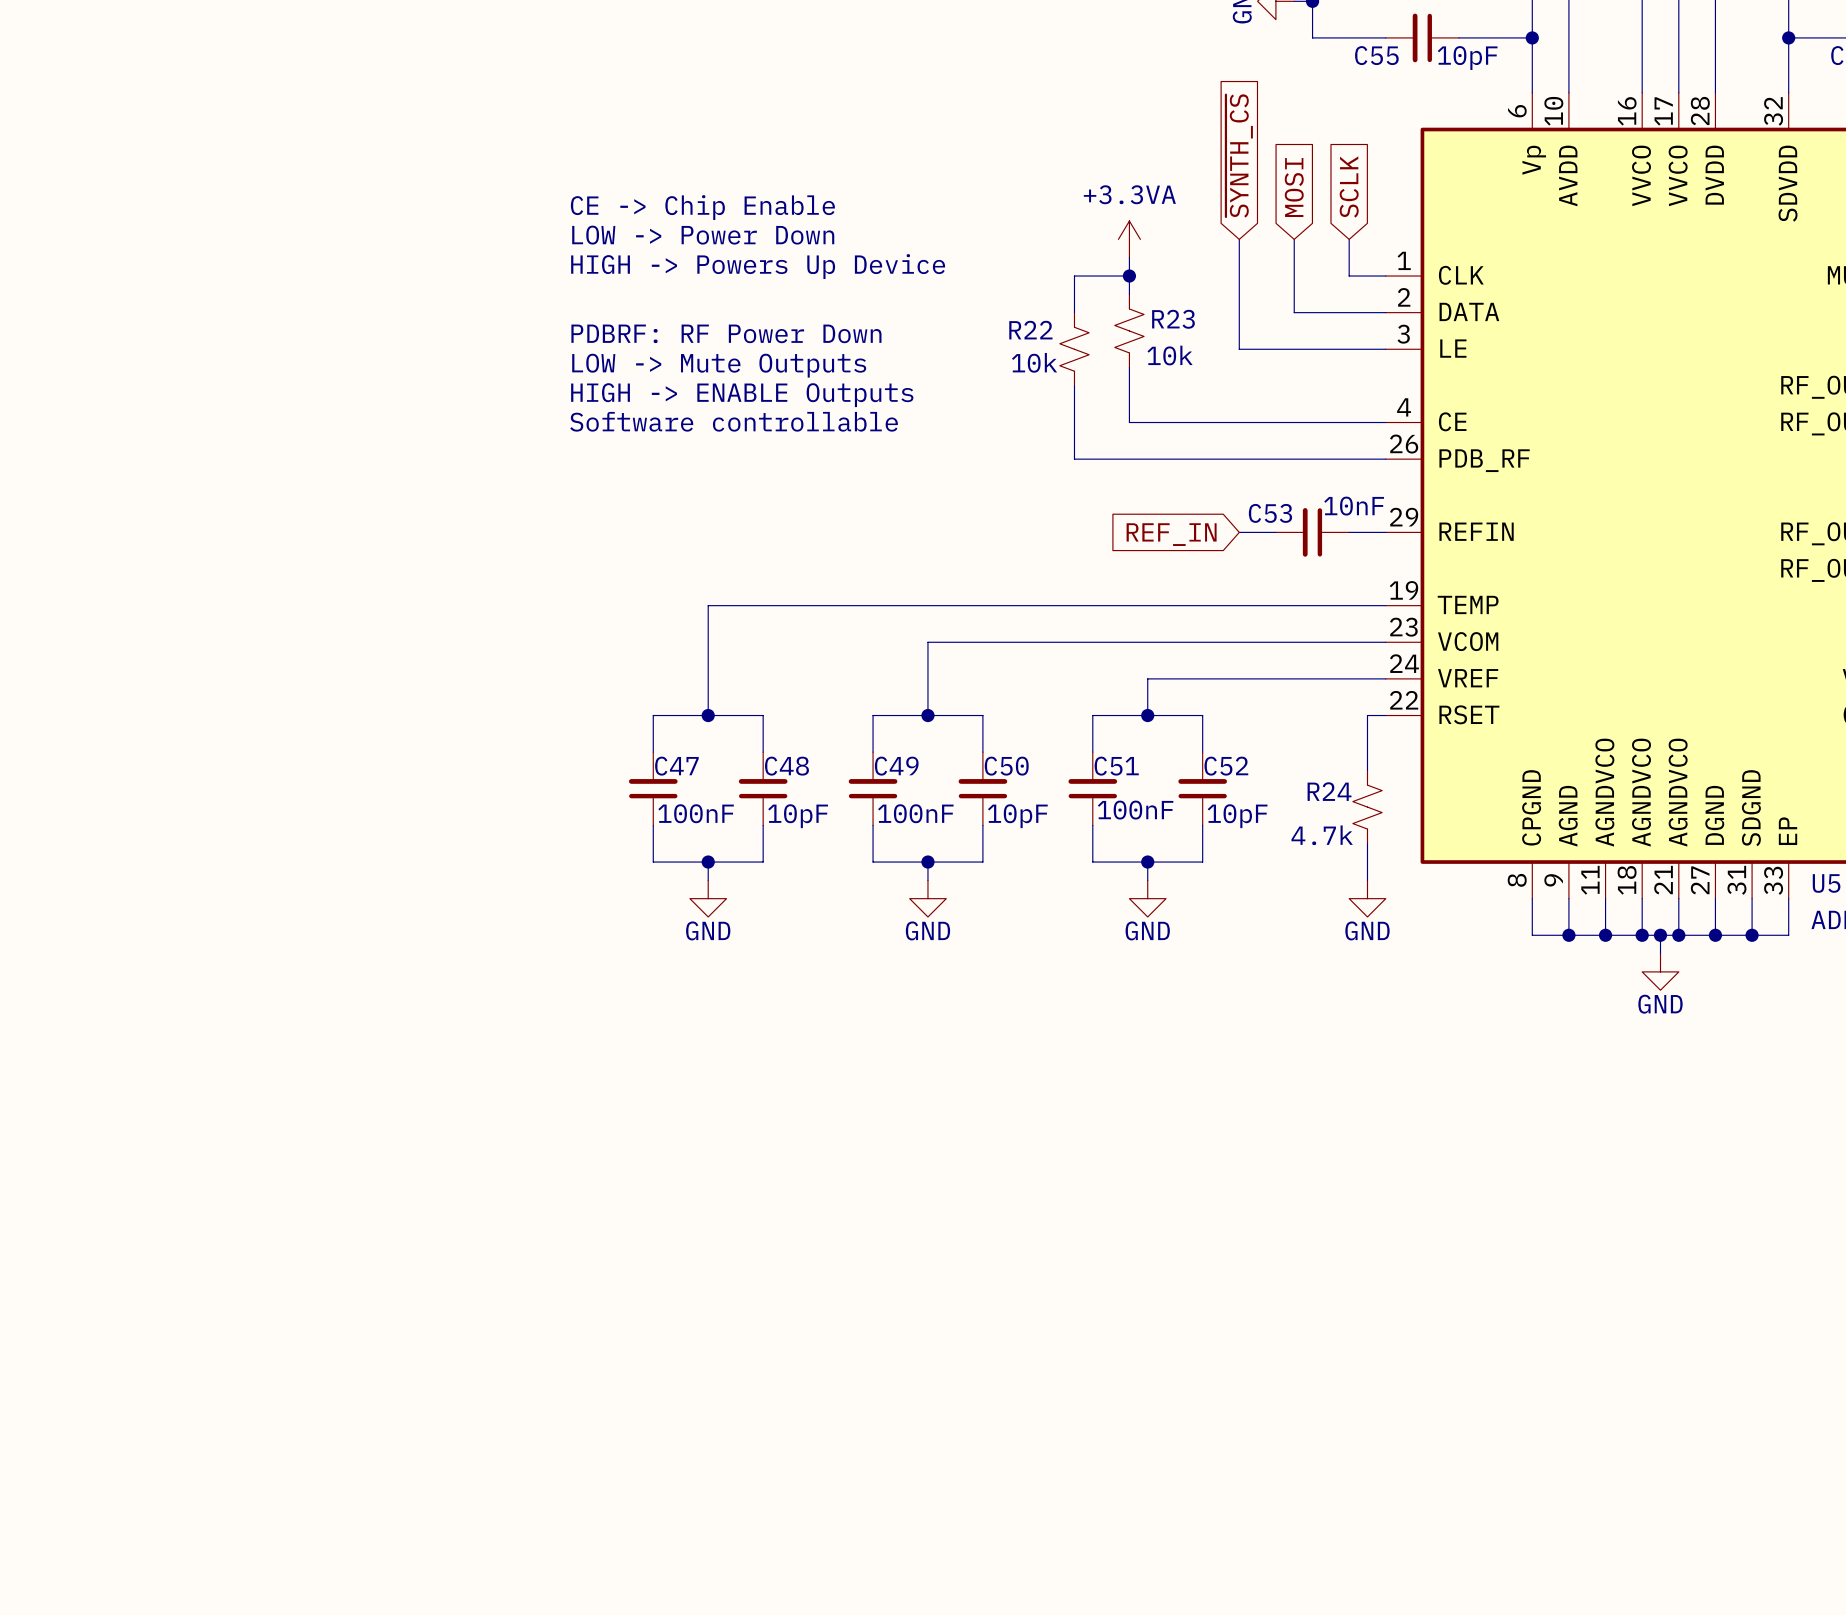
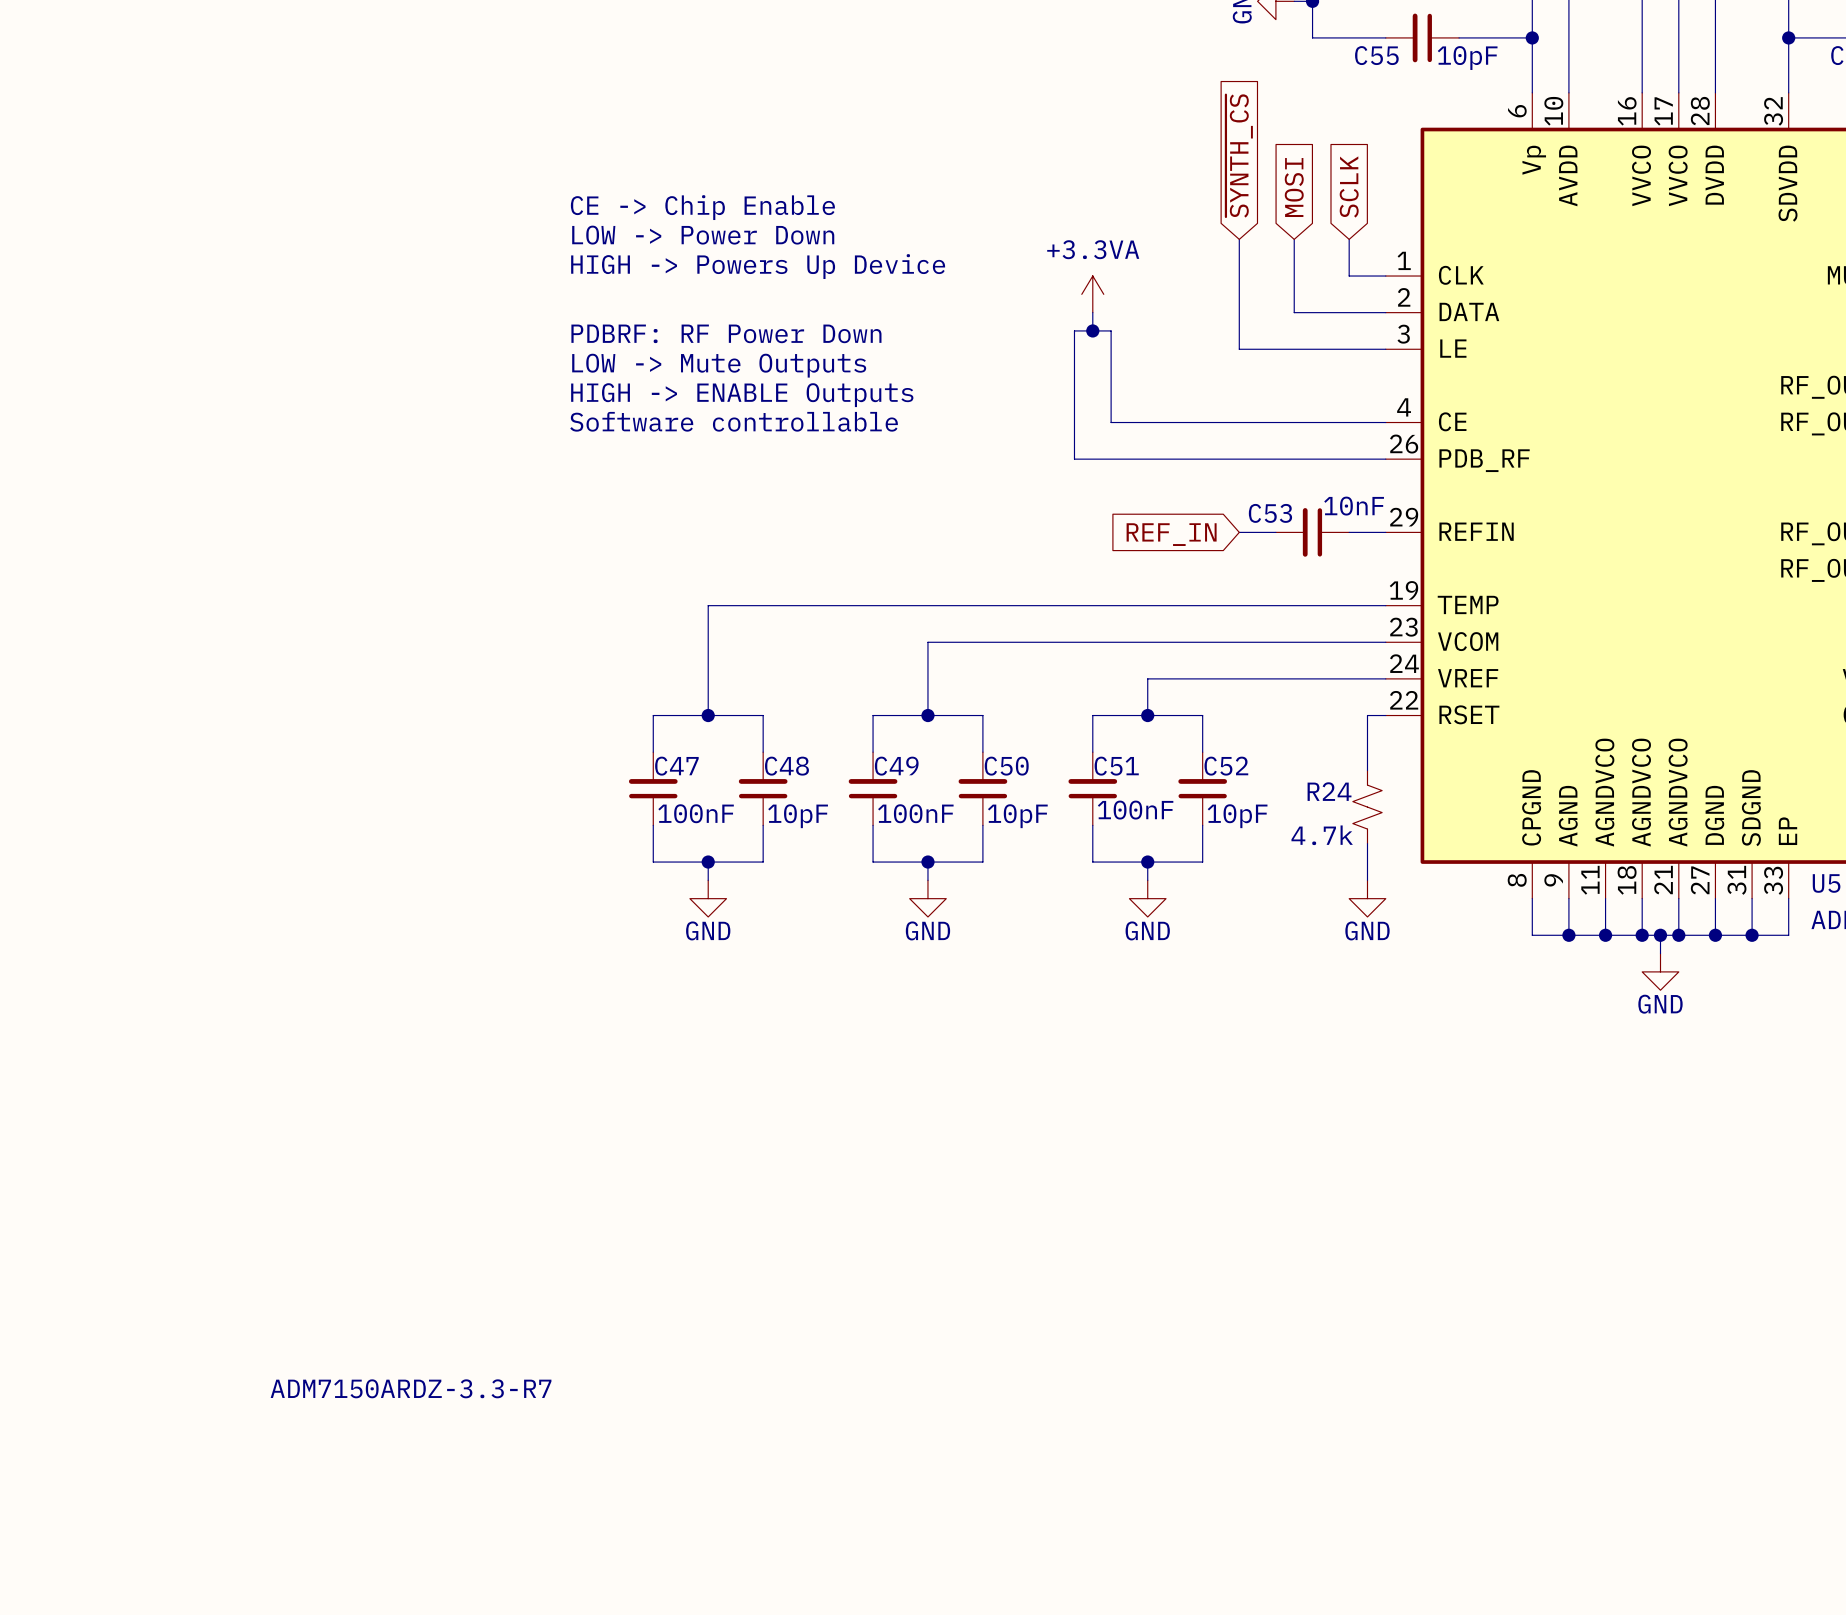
power symbol position: +3.3VA (1129, 239) -> +3.3VA (1092, 294)
wire: (1129, 257) (1129, 294) -> none
wire: (1129, 276) (1074, 276) (1074, 312) -> none
junction position: (1129, 276) -> (1092, 330)
wire: none -> (1092, 312) (1092, 330)
R23: 10k (1129, 330) -> none
R22: 10k (1074, 349) -> none
wire: (1129, 367) (1129, 422) -> (1074, 385) (1074, 330) (1111, 330) (1111, 422) (1129, 422)
text: none -> ADM7150ARDZ-3.3-R7 (411, 1388)

